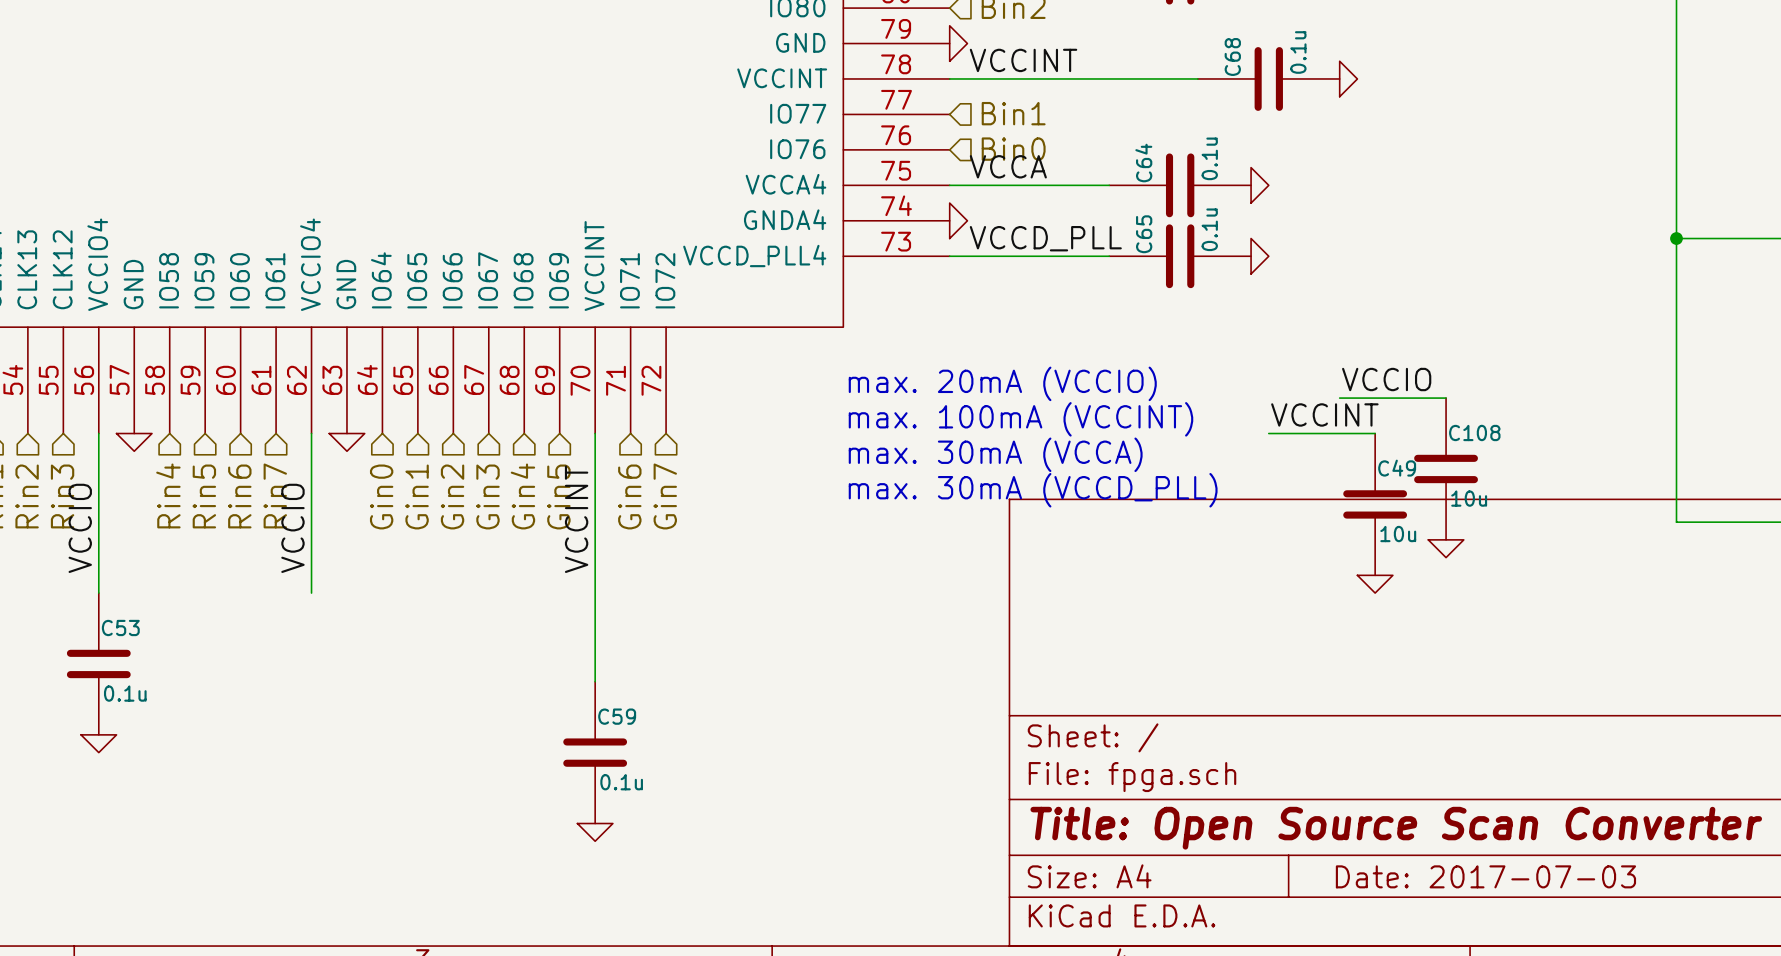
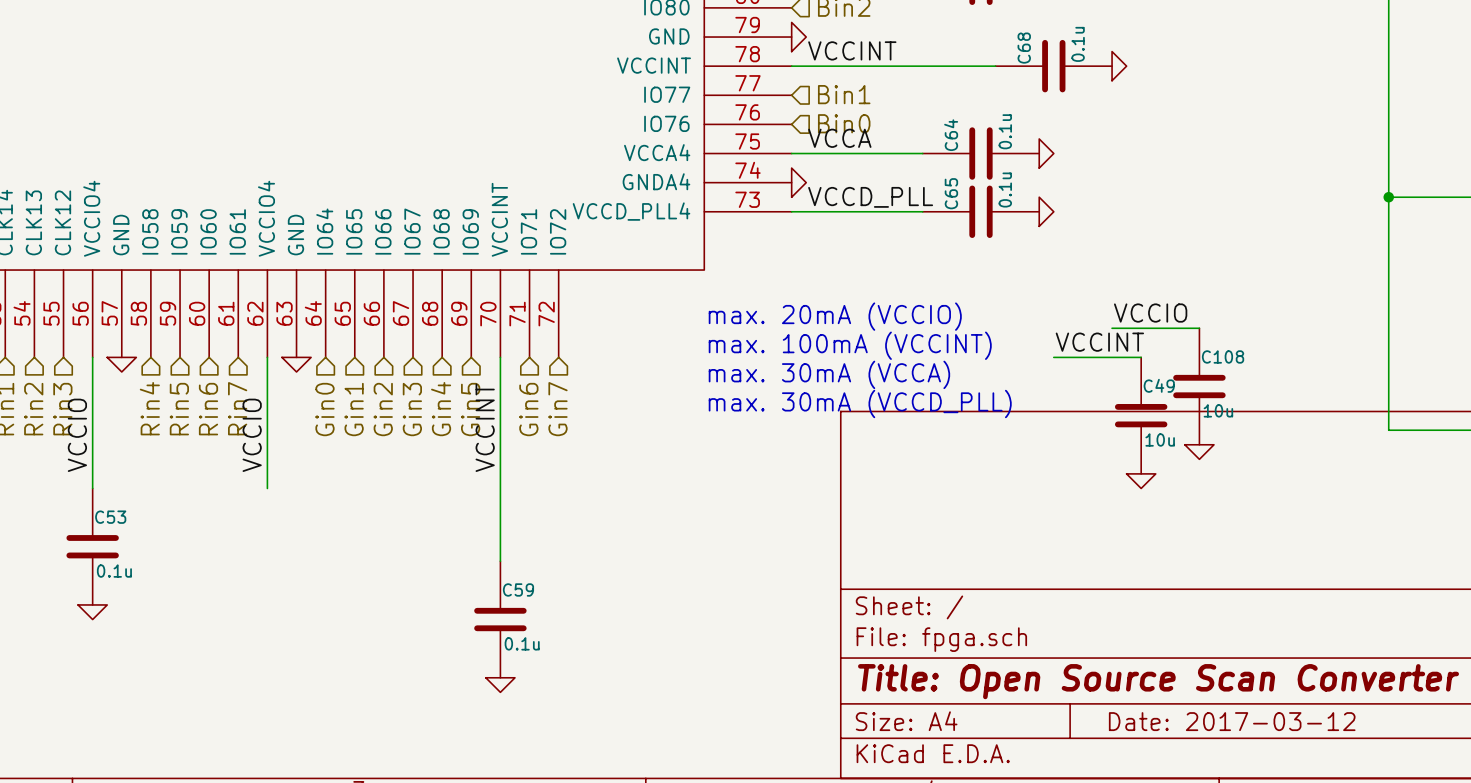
title block: Date: 2017-07-03 (1485, 876) -> Date: 2017-03-12 (1232, 721)

